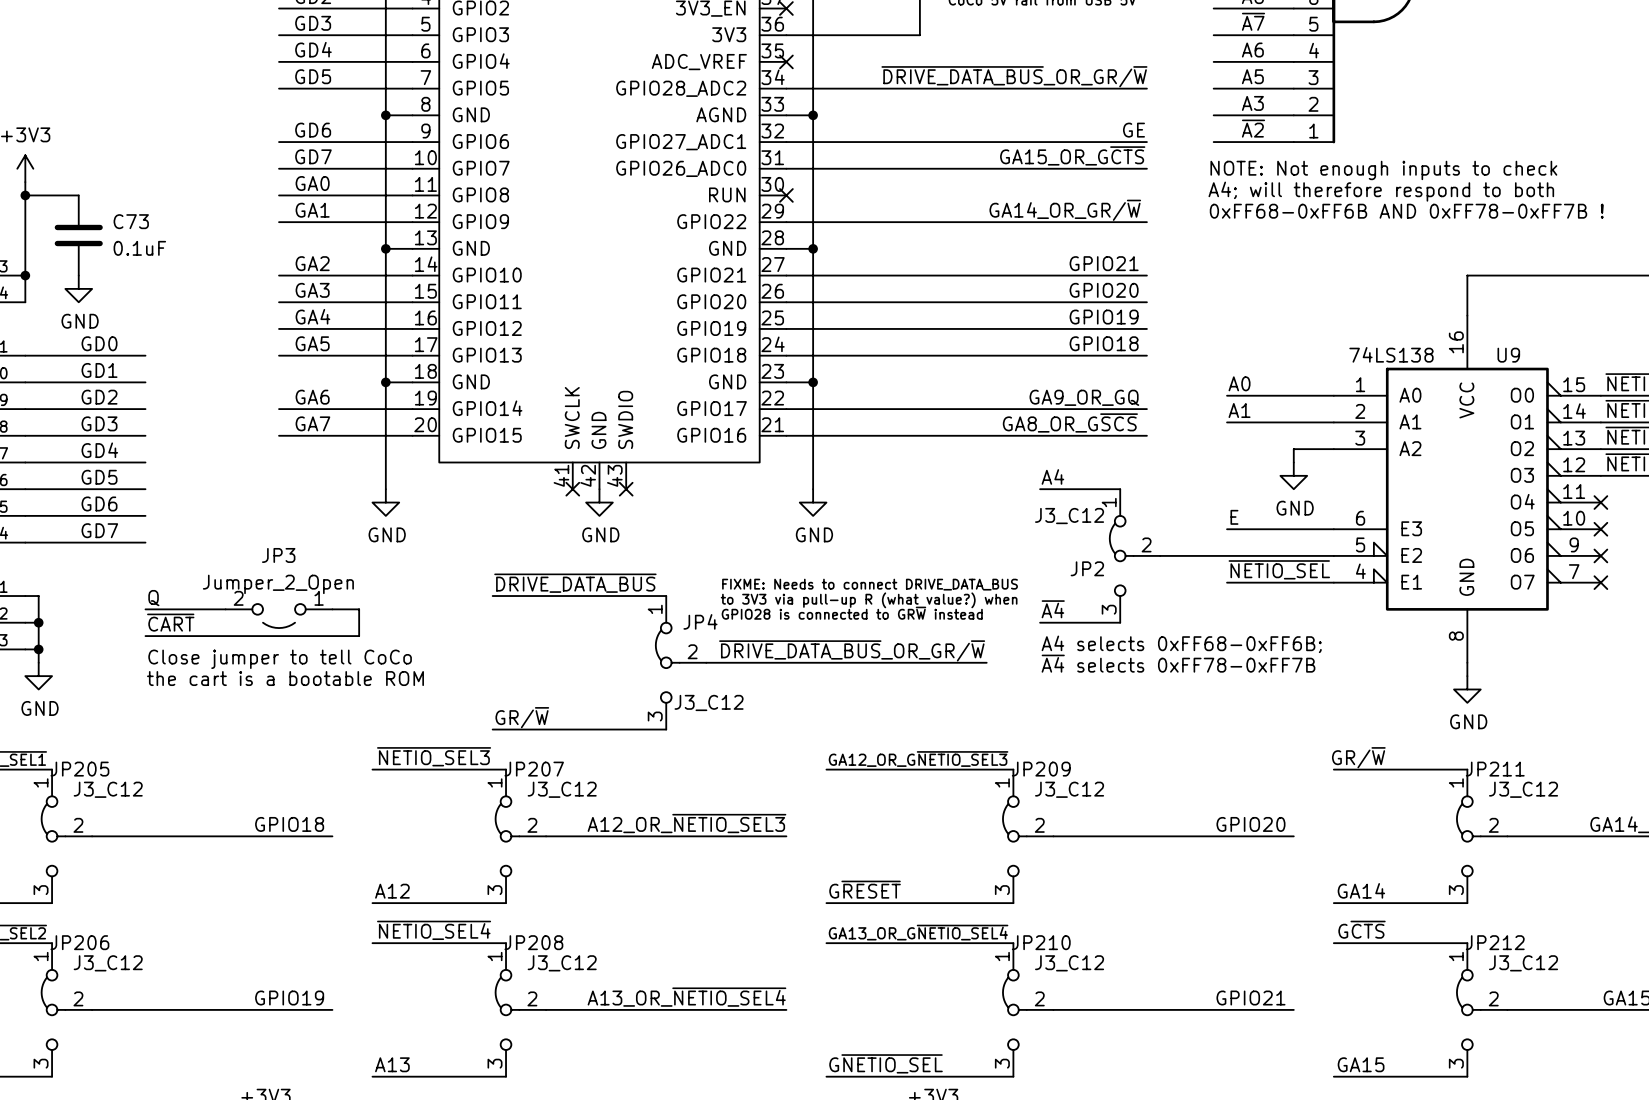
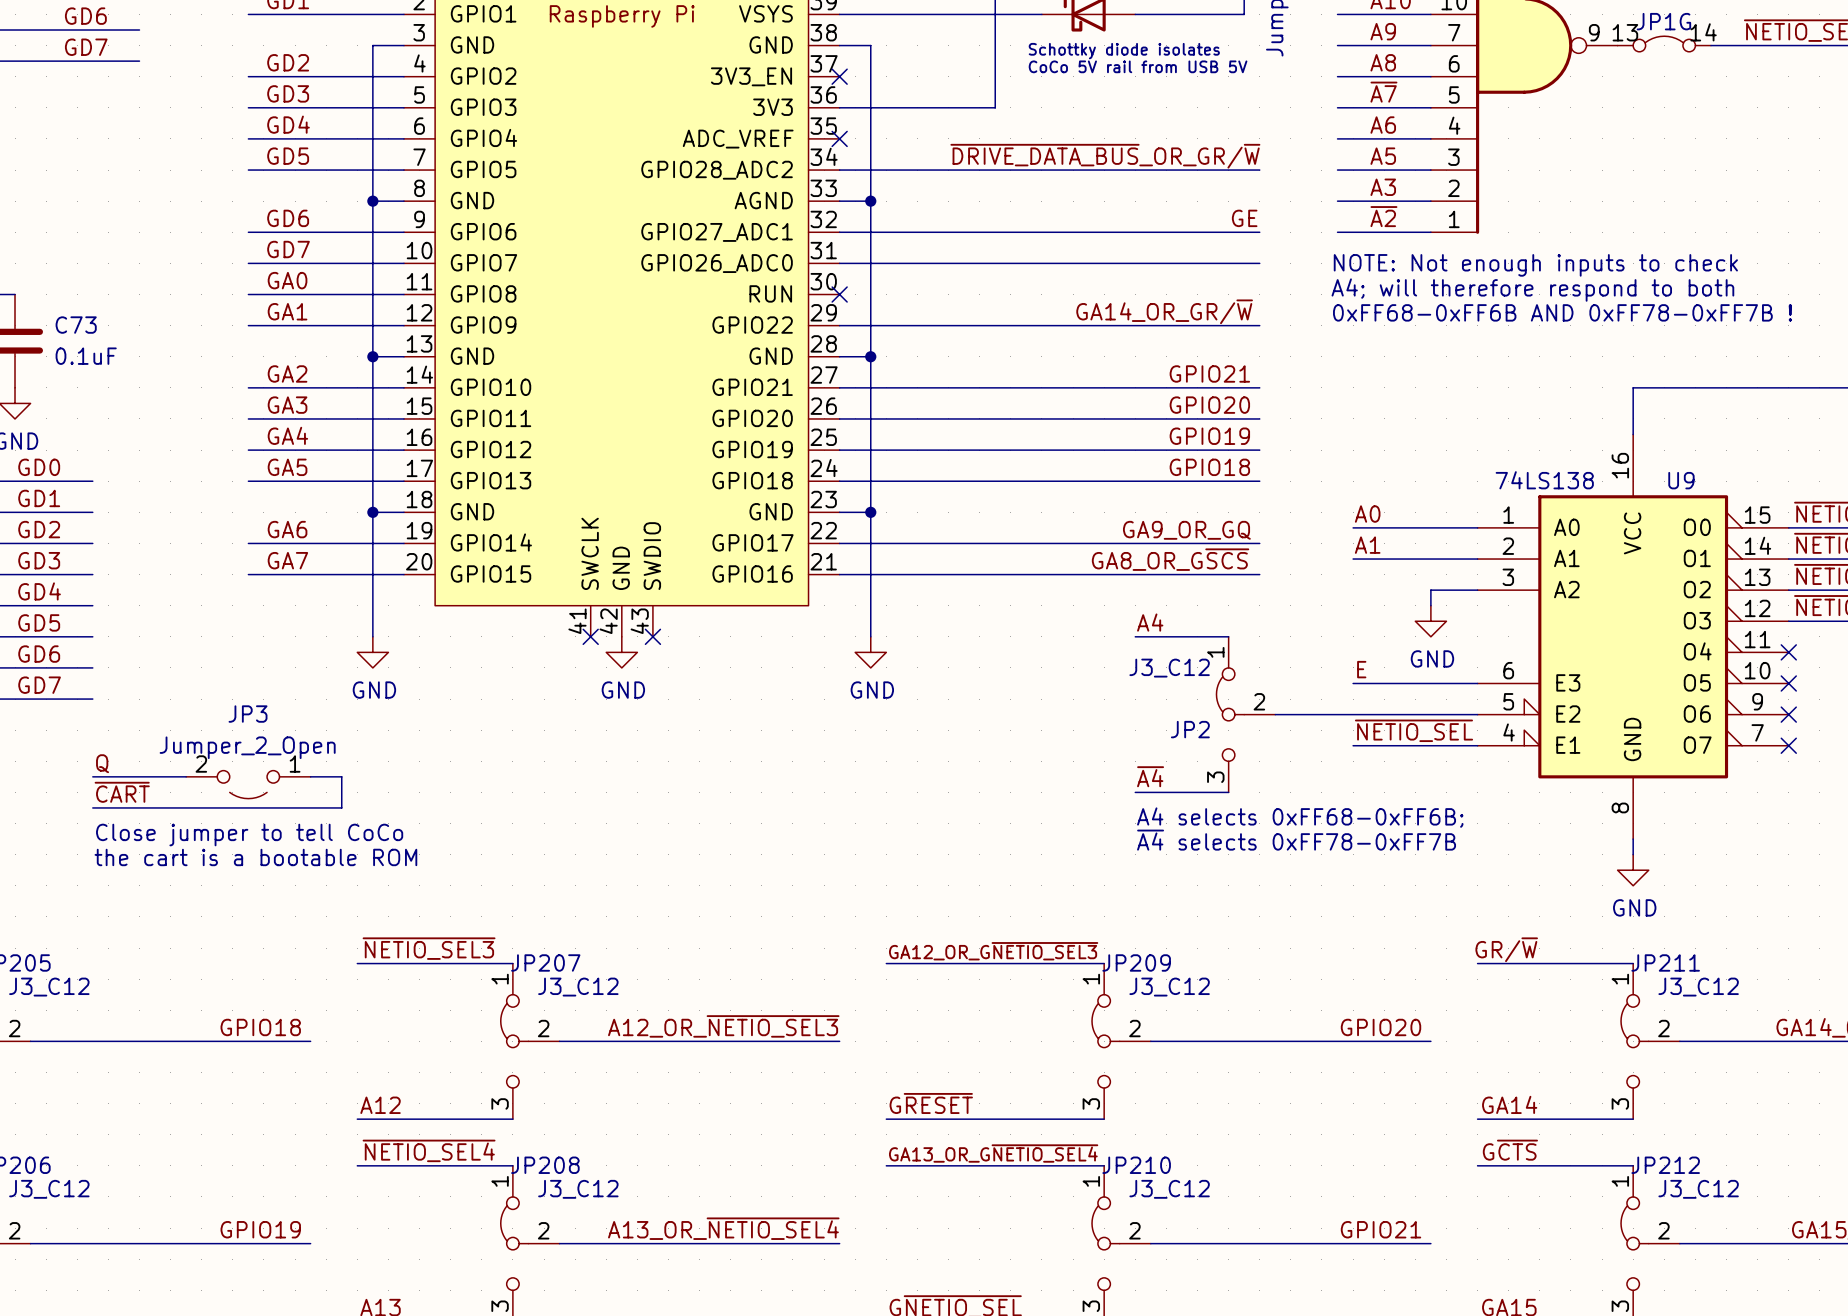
label: GA15_OR_G~{CTS} (1072, 155) -> none
label: ~{DRIVE_DATA_BUS} (575, 583) -> none
text: FIXME: Needs to connect DRIVE_DATA_BUS (870, 584) -> none
wire: (492, 596) (666, 596) -> none
text: to 3V3 via pull-up R (what value?) when (869, 600) -> none
text: GPIO28 is connected to GR~{W} instead (852, 613) -> none
label: ~{DRIVE_DATA_BUS}_OR_GR/~{W} (852, 650) -> none
JP4: J3_C12 (681, 662) -> none
wire: (706, 662) (986, 662) -> none
label: GR/~{W} (522, 717) -> none
wire: (492, 729) (666, 729) -> none

